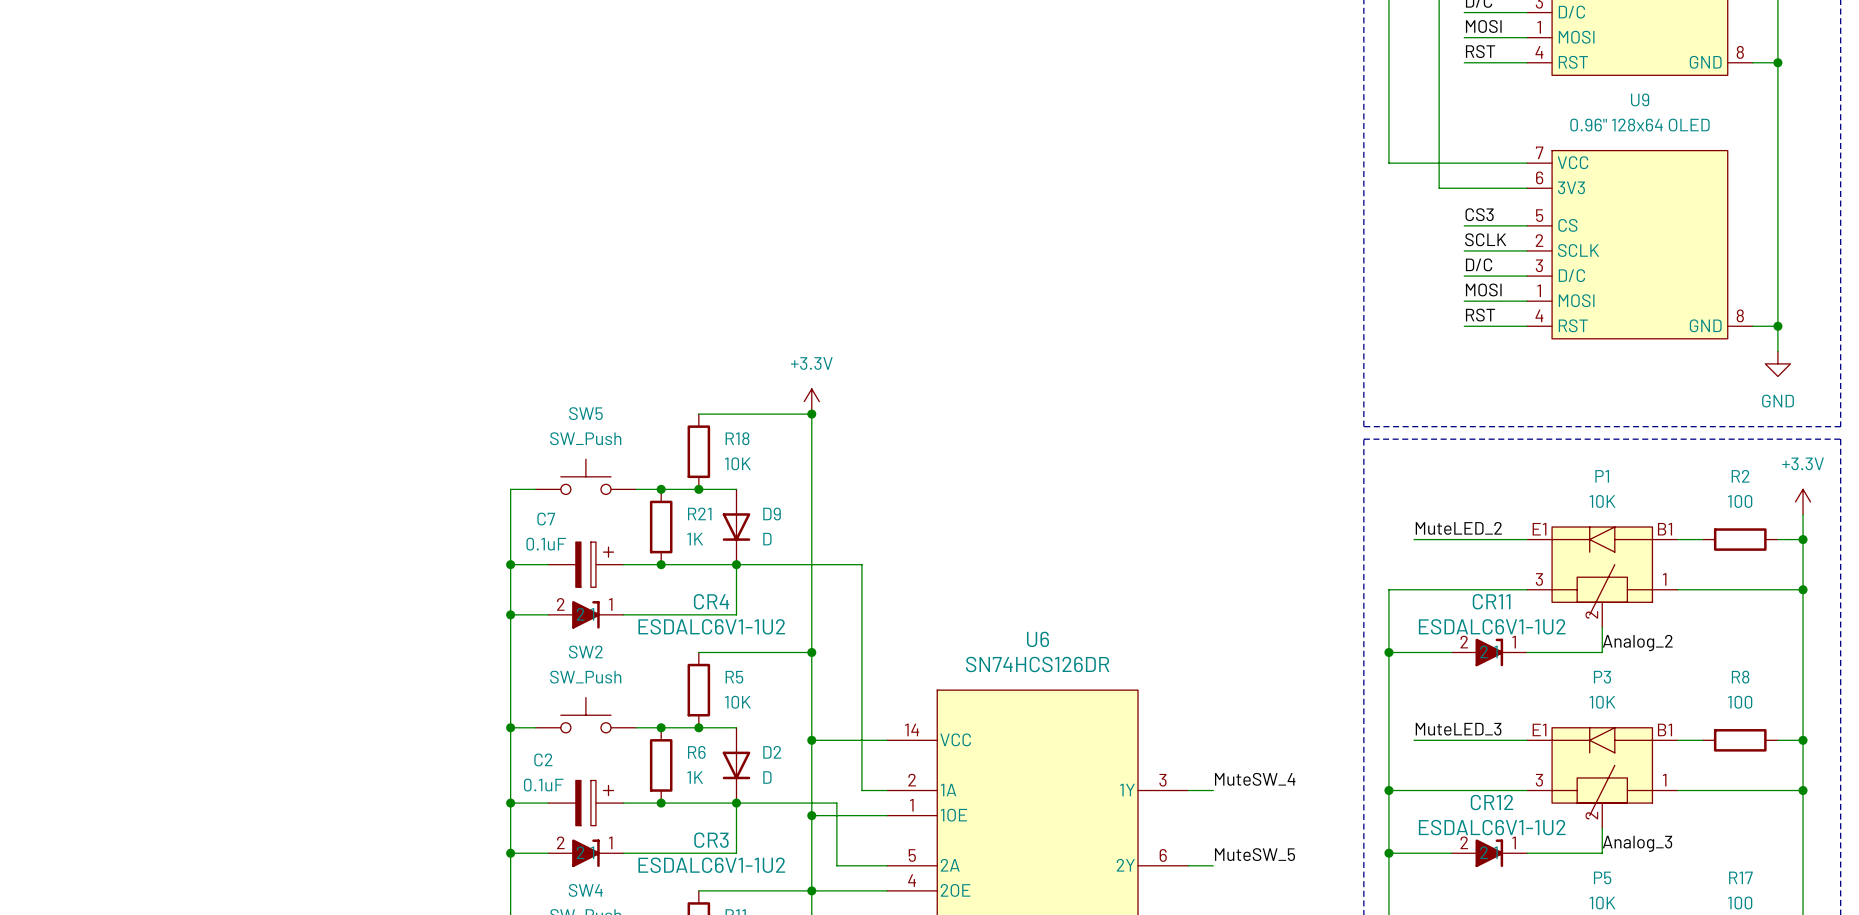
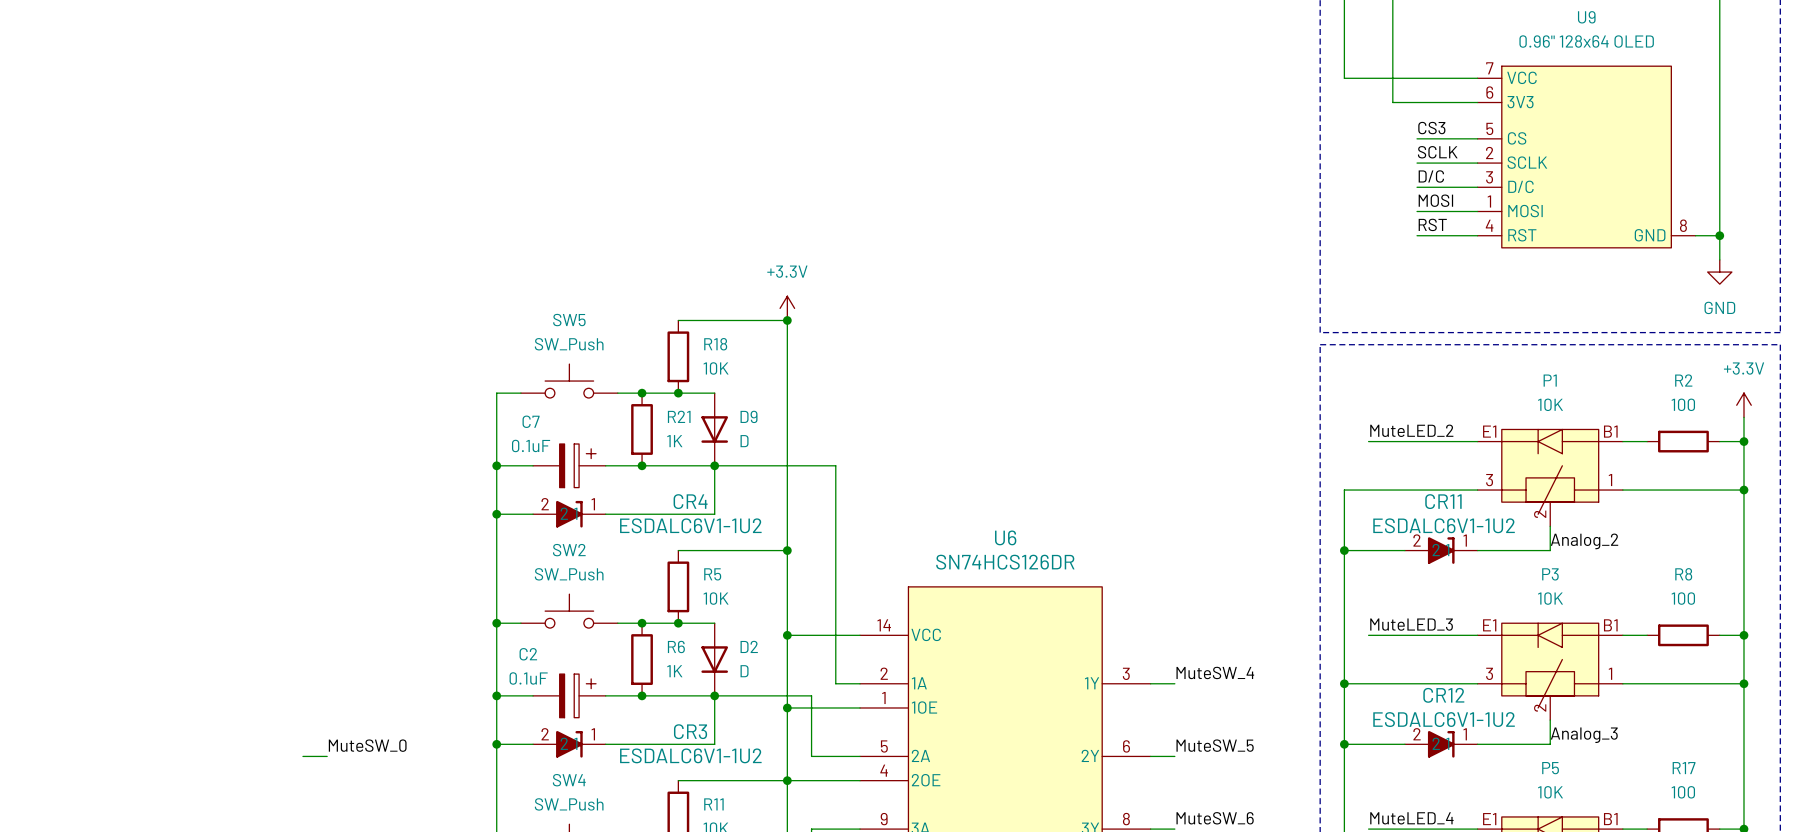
label: none -> MuteSW_0 (367, 745)
wire: none -> (302, 756) (327, 756)

